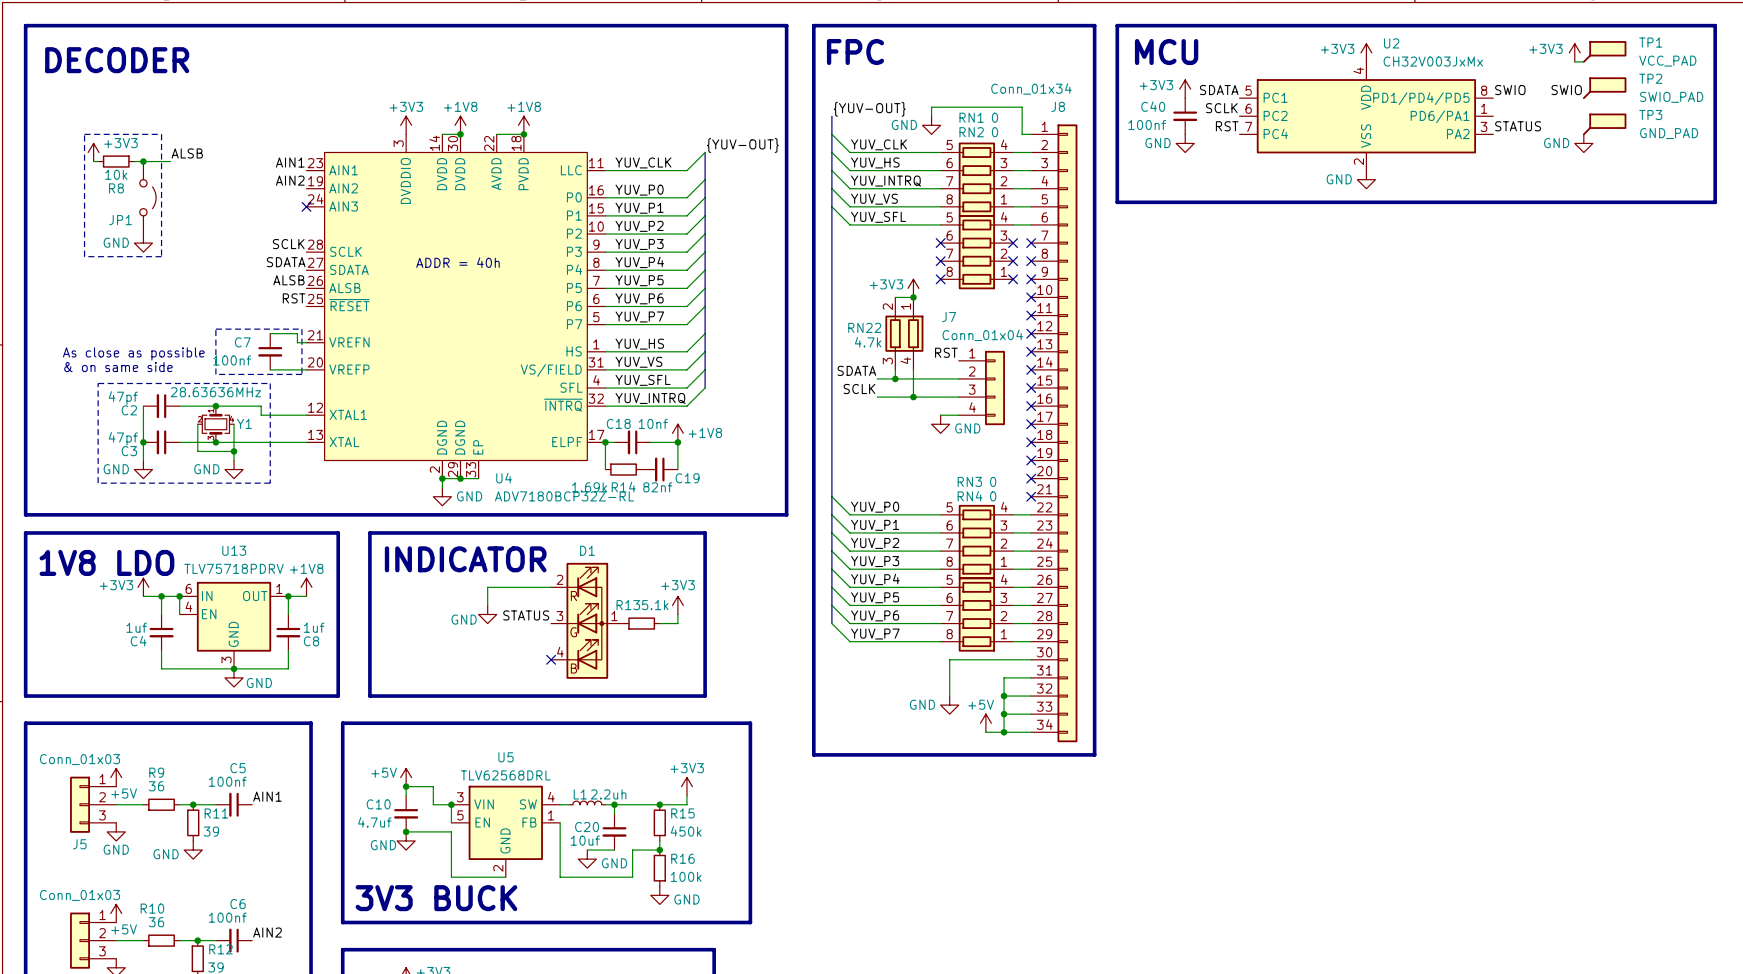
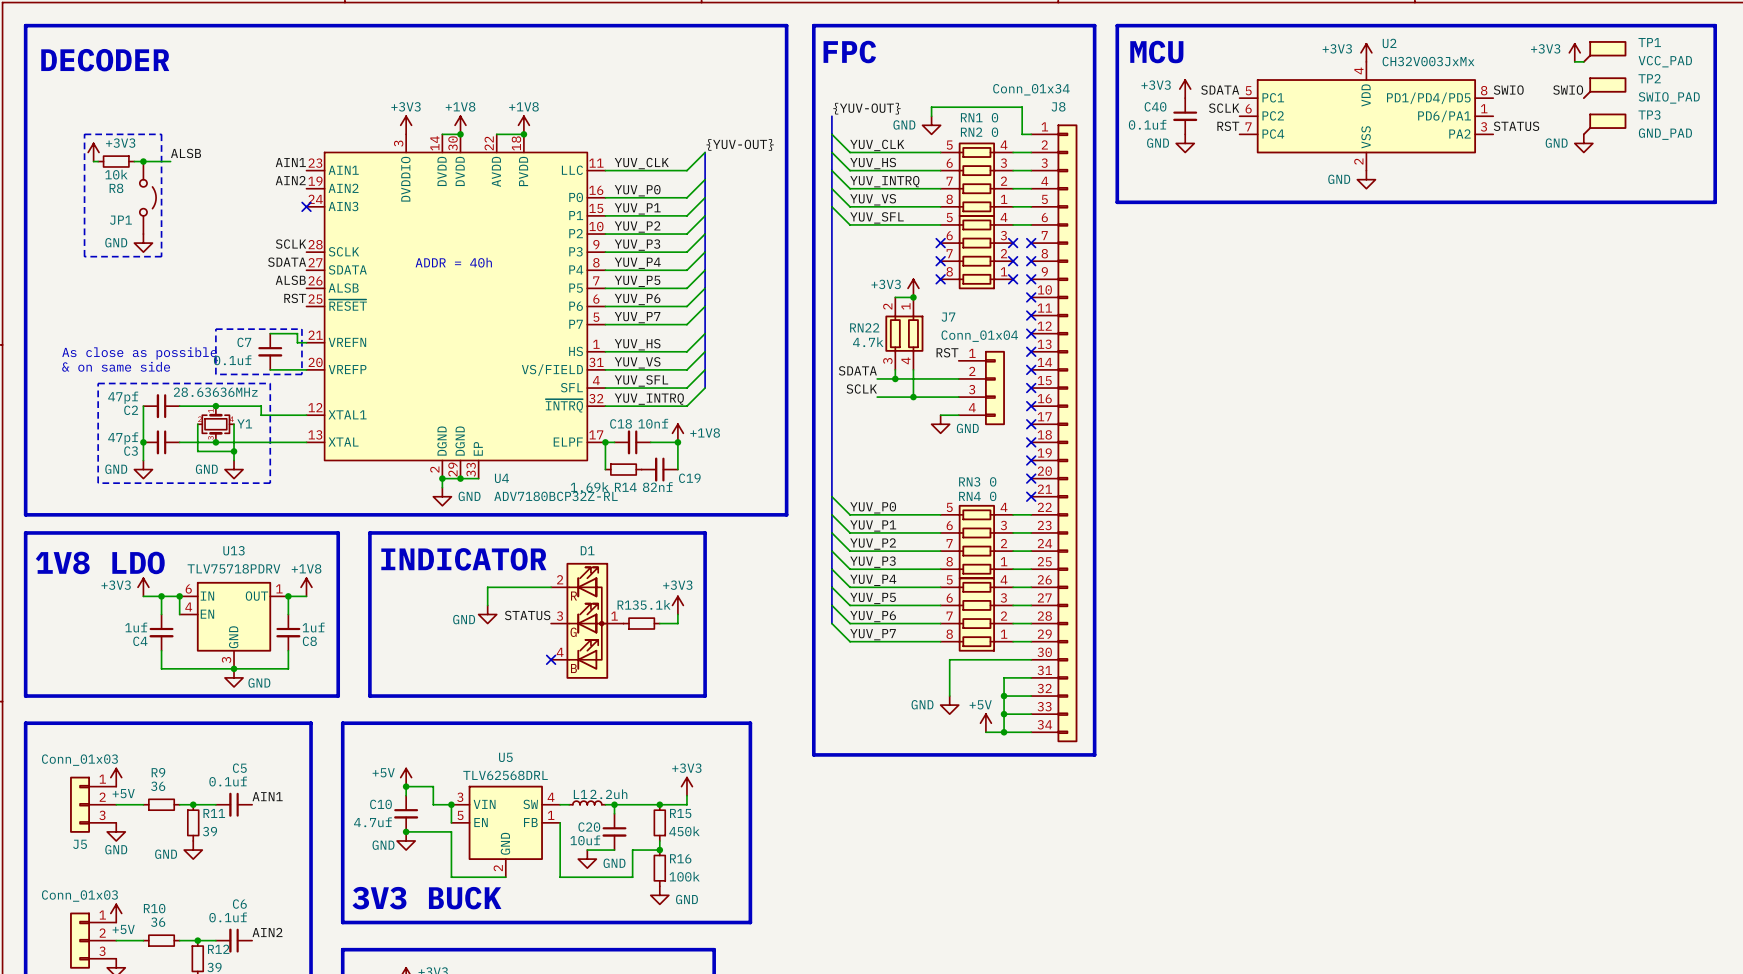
C40 value: 100nf (1147, 124) -> 0.1uf (1147, 124)
C7 value: 100nf (232, 360) -> 0.1uf (232, 360)
C5 value: 100nf (227, 781) -> 0.1uf (228, 781)
C6 value: 100nf (227, 917) -> 0.1uf (228, 917)

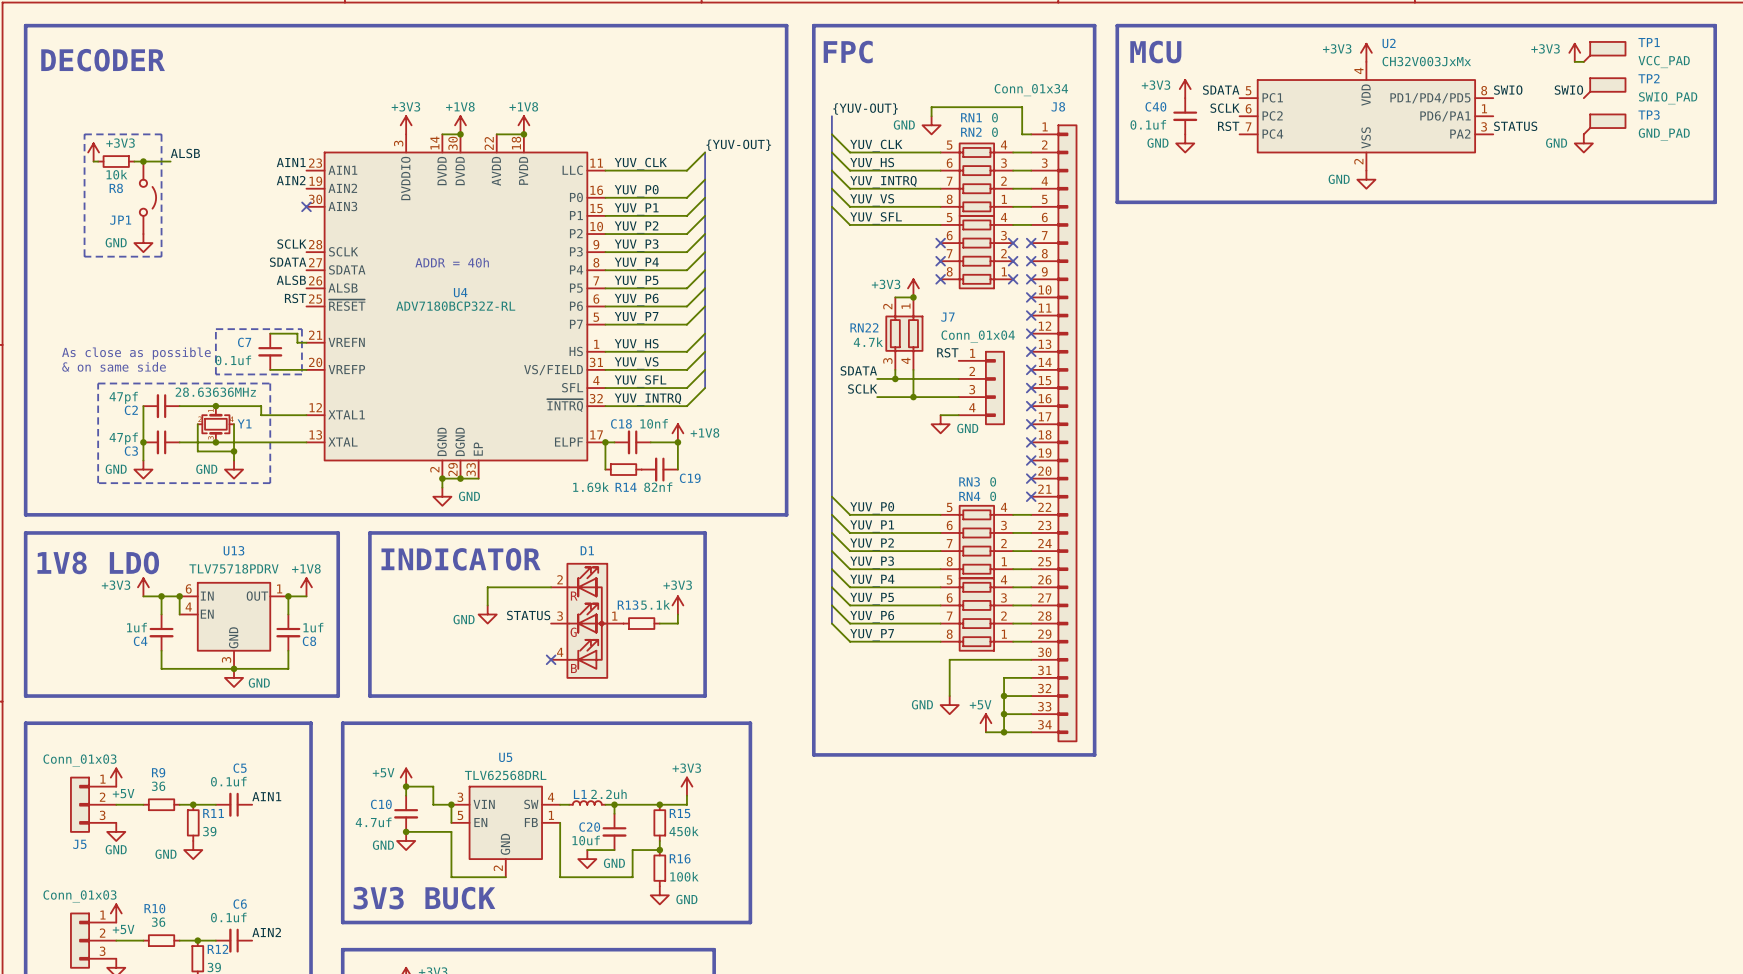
U4 pin number: 24 (315, 199) -> 30 (315, 199)
U4 name position: U4 (501, 478) -> U4 (460, 292)
U4 value position: ADV7180BCP32Z-RL (555, 496) -> ADV7180BCP32Z-RL (455, 306)

